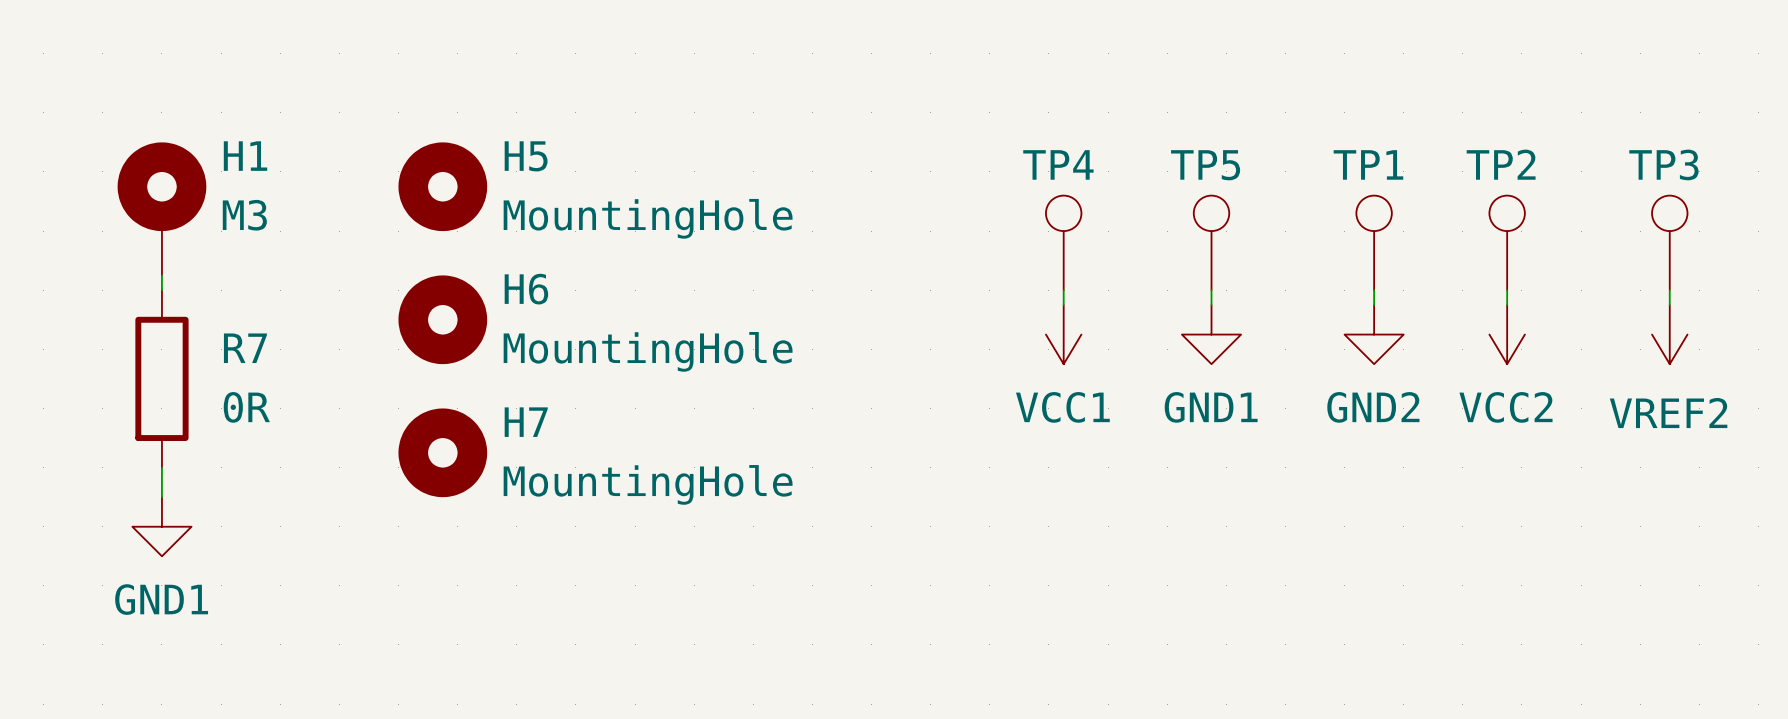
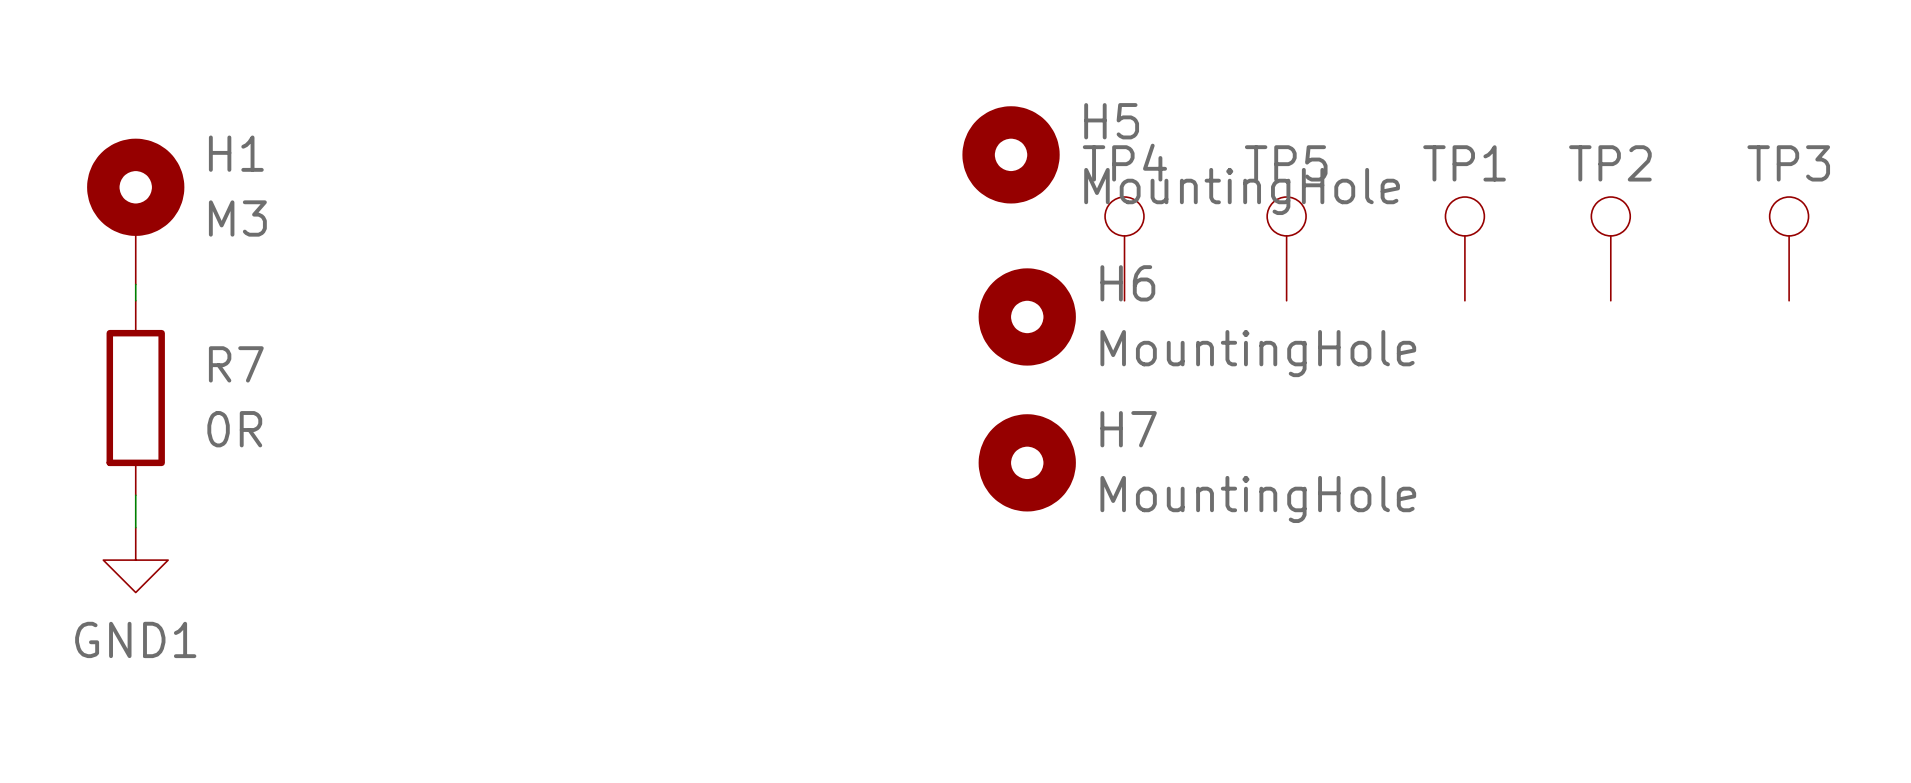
H5 position: (442, 186) -> (1011, 154)
wire: (1063, 290) (1063, 305) -> none
wire: (1211, 290) (1211, 305) -> none
wire: (1374, 290) (1374, 305) -> none
wire: (1507, 290) (1507, 305) -> none
wire: (1669, 290) (1669, 305) -> none
H6 position: (442, 319) -> (1027, 316)
power symbol: VCC1 (1063, 334) -> none
power symbol: GND1 (1211, 334) -> none
power symbol: GND2 (1374, 334) -> none
power symbol: VCC2 (1507, 334) -> none
power symbol: VREF2 (1669, 334) -> none
H7 position: (442, 452) -> (1027, 462)

